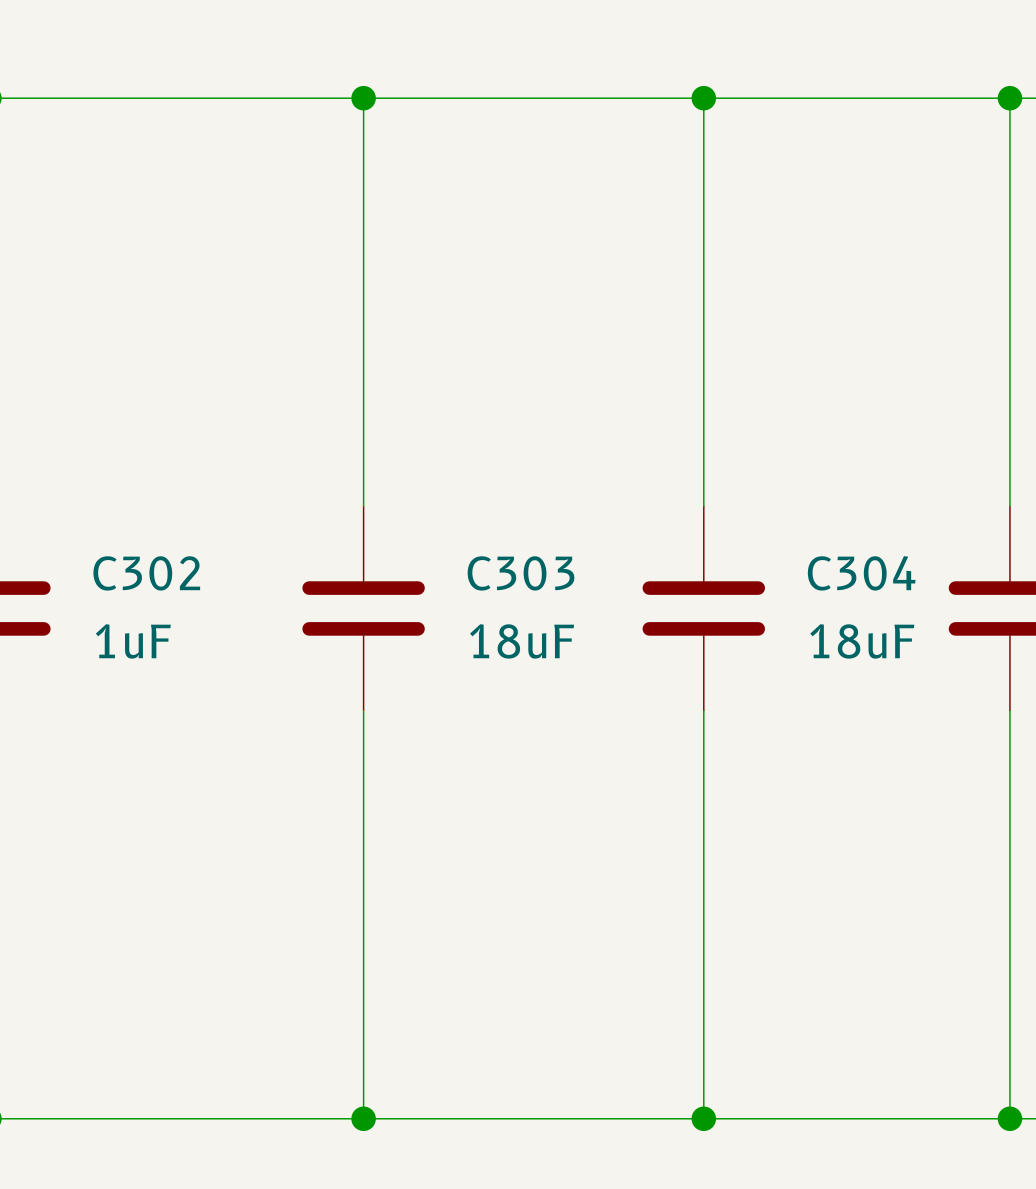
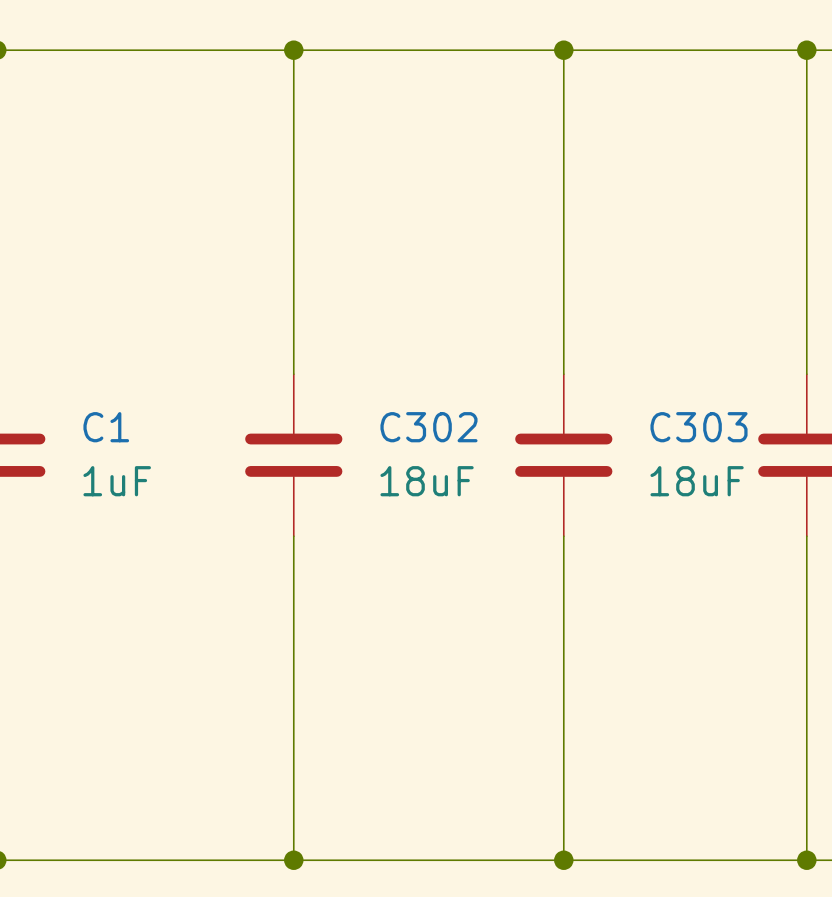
C302 name: C302 (146, 573) -> C1 (106, 427)
C303 name: C303 (521, 573) -> C302 (428, 427)
C304 name: C304 (861, 573) -> C303 (699, 427)

